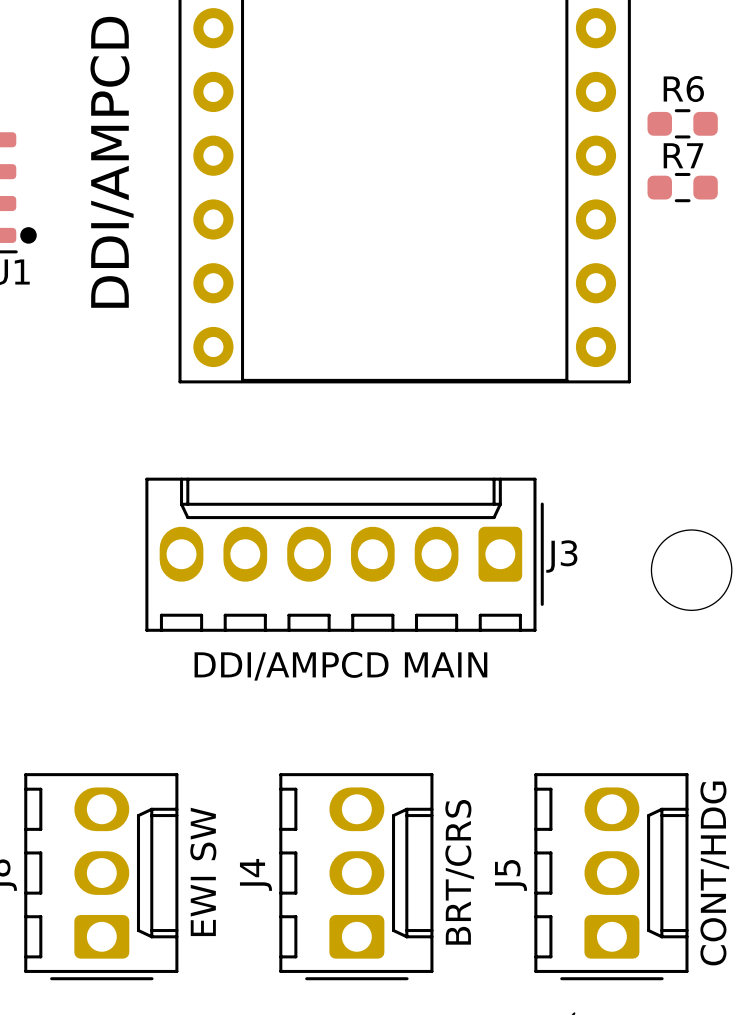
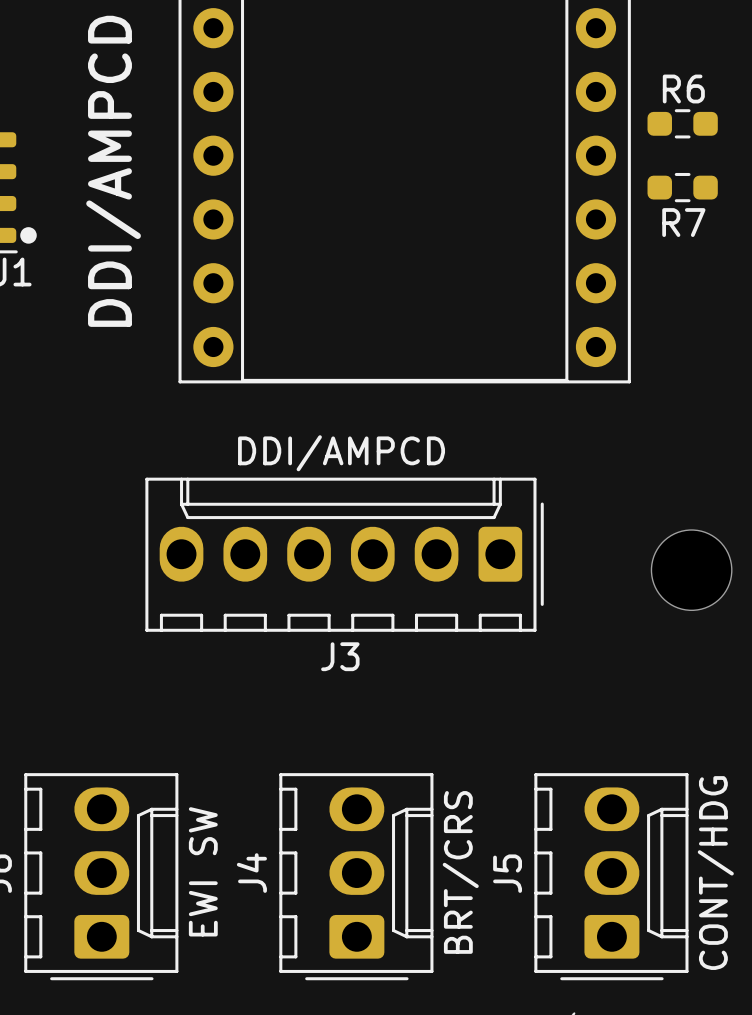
R7 name position: R7 (683, 155) -> R7 (683, 222)
J3 name position: J3 (561, 556) -> J3 (340, 656)
J3 value: DDI/AMPCD MAIN (340, 666) -> DDI/AMPCD (341, 453)

